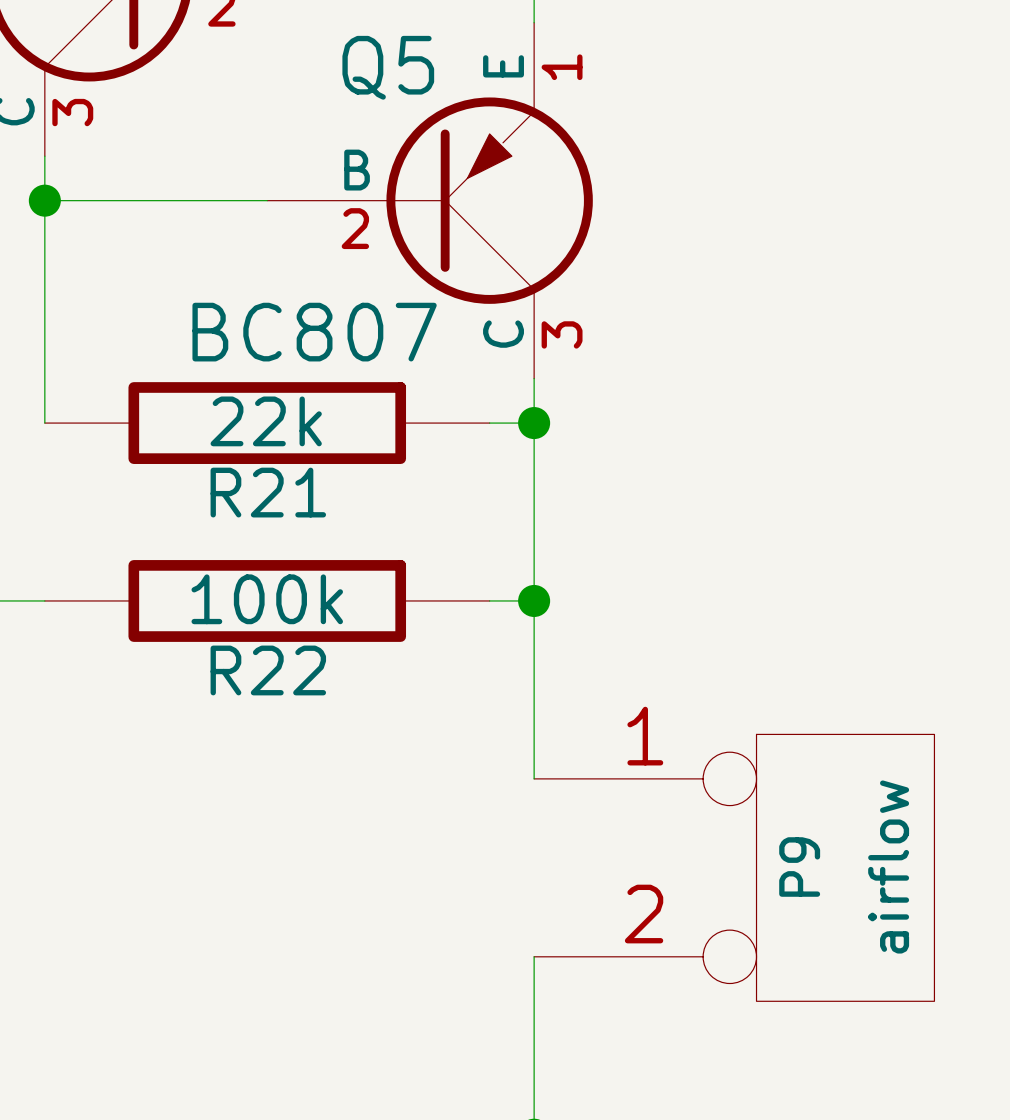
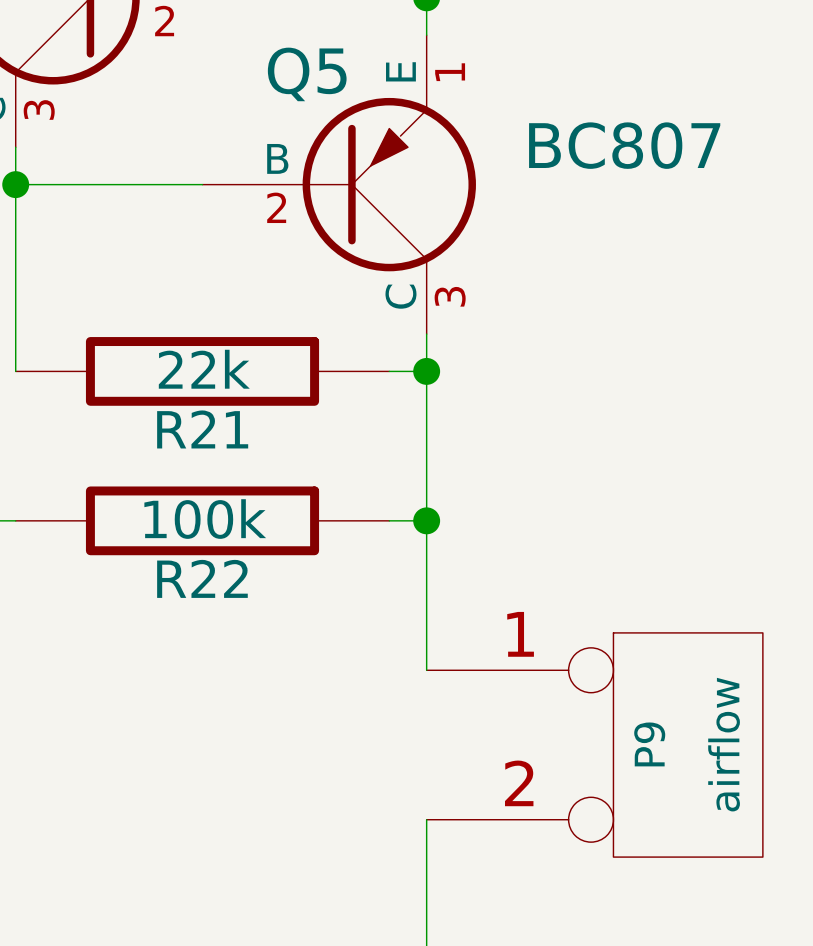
Q5 value position: BC807 (314, 332) -> BC807 (624, 145)

